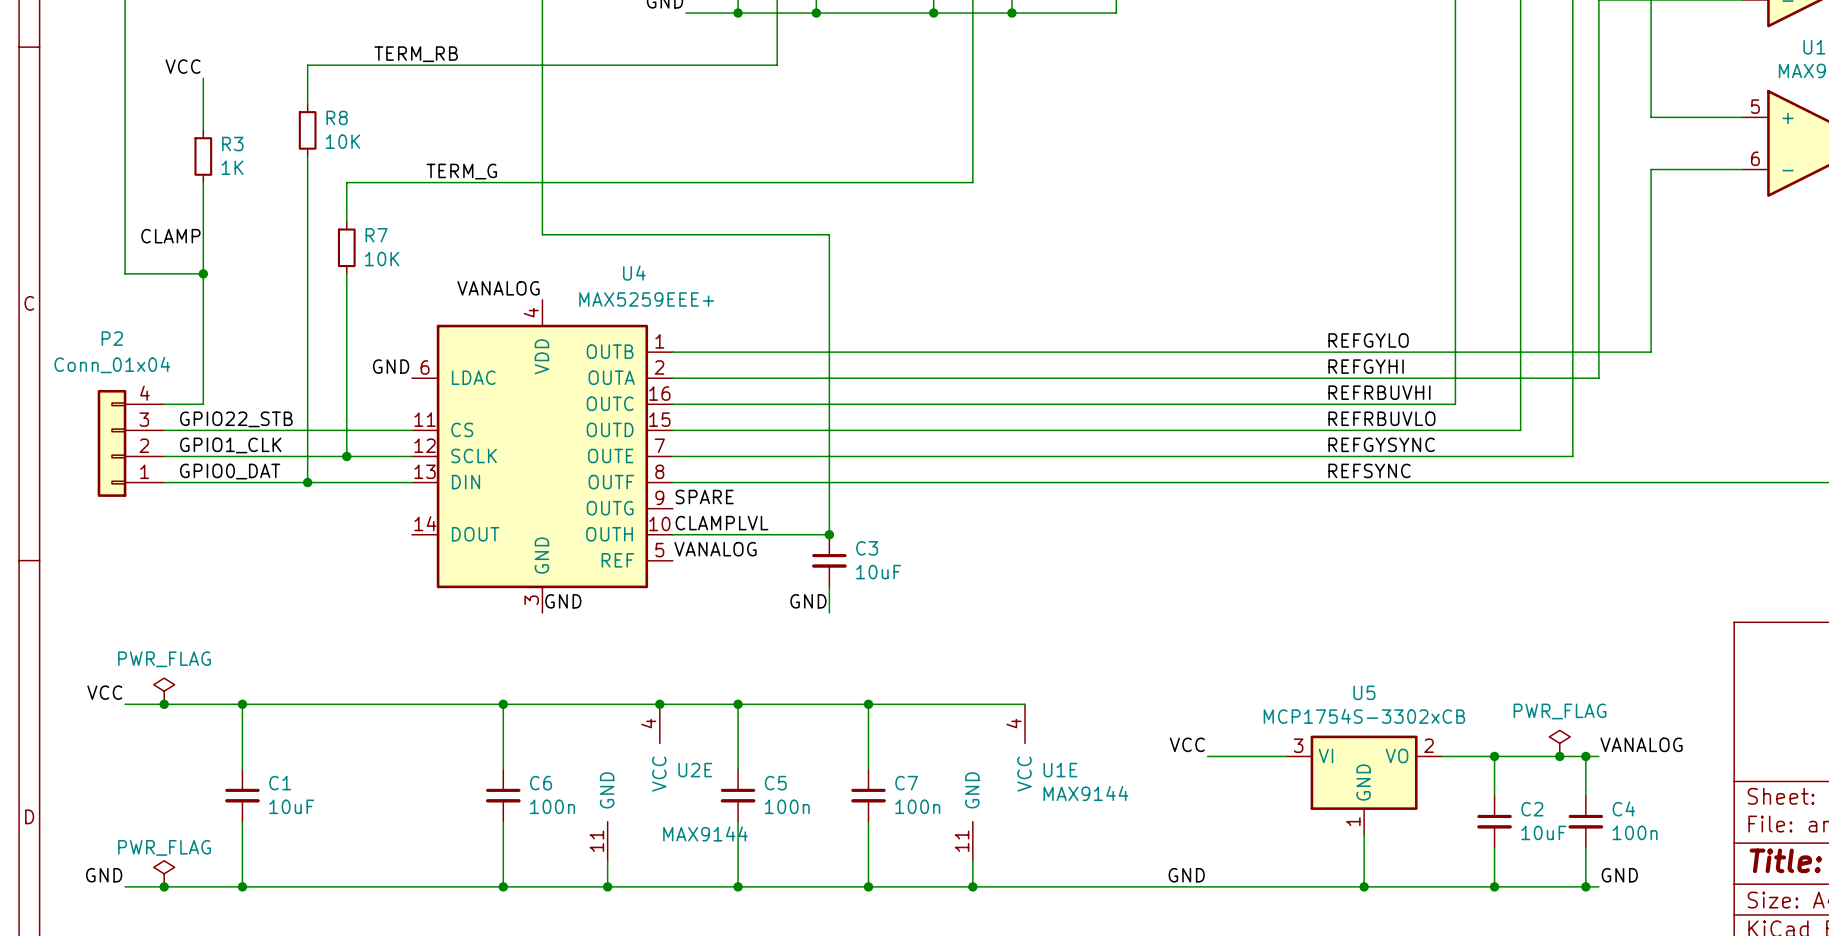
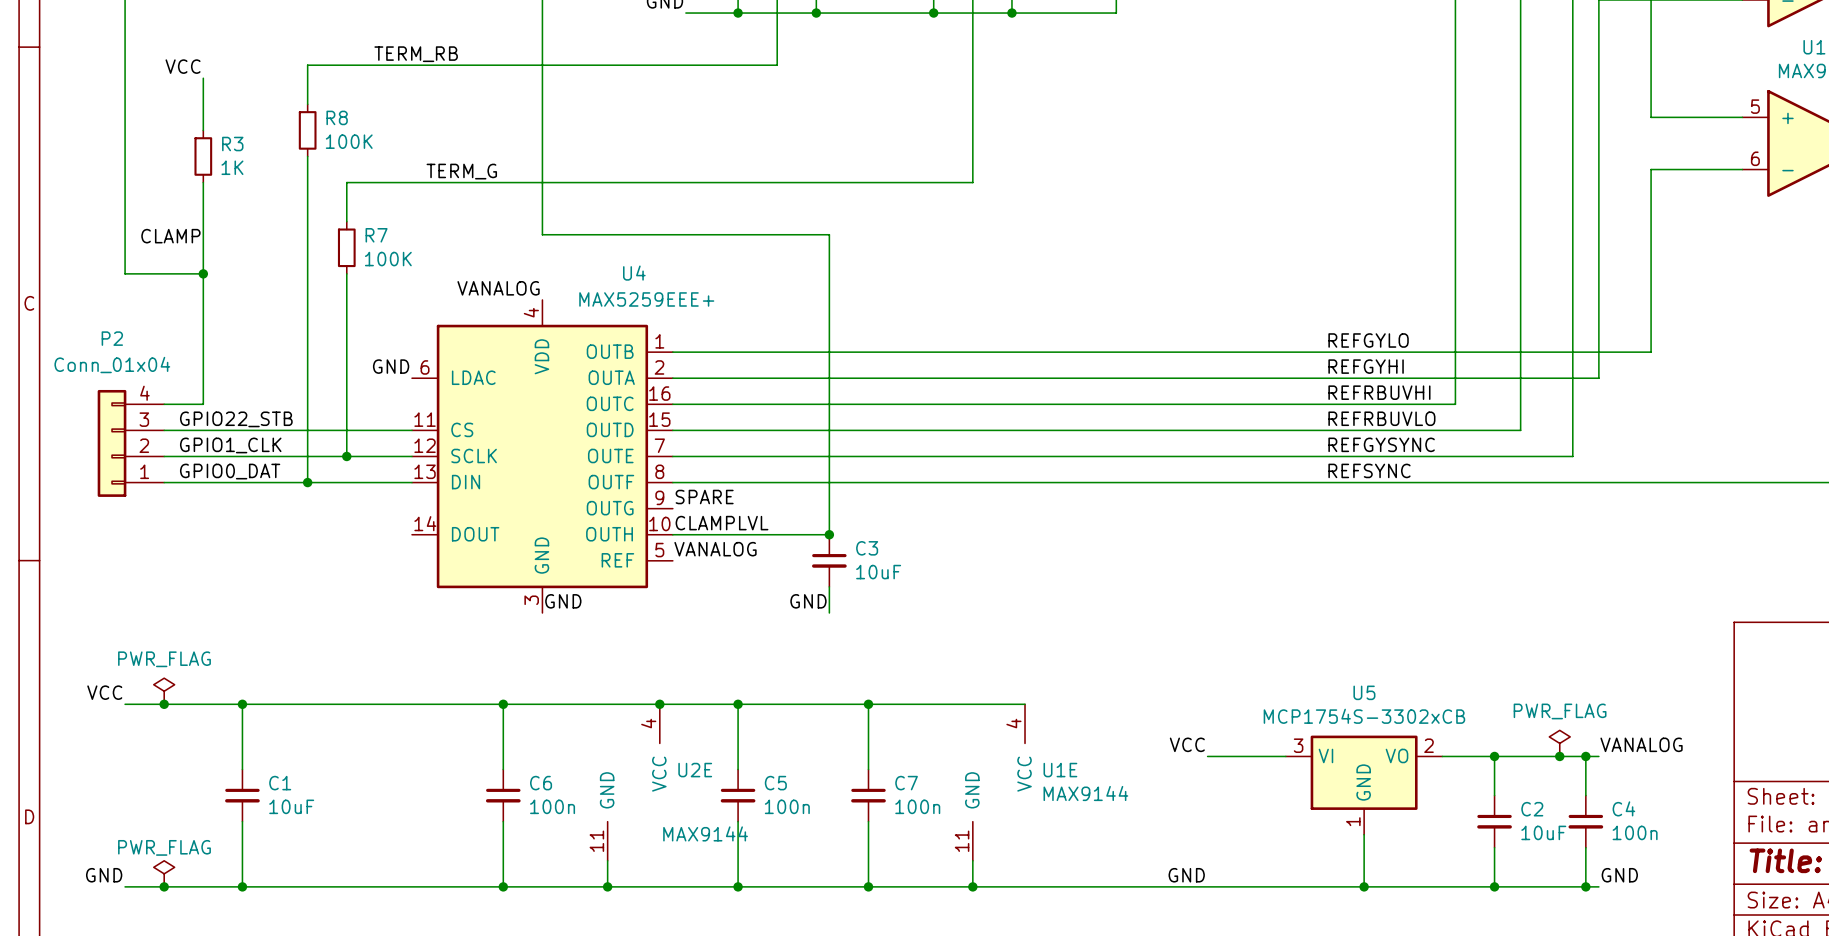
R8 value: 10K (343, 141) -> 100K (349, 141)
R7 value: 10K (382, 259) -> 100K (388, 259)

